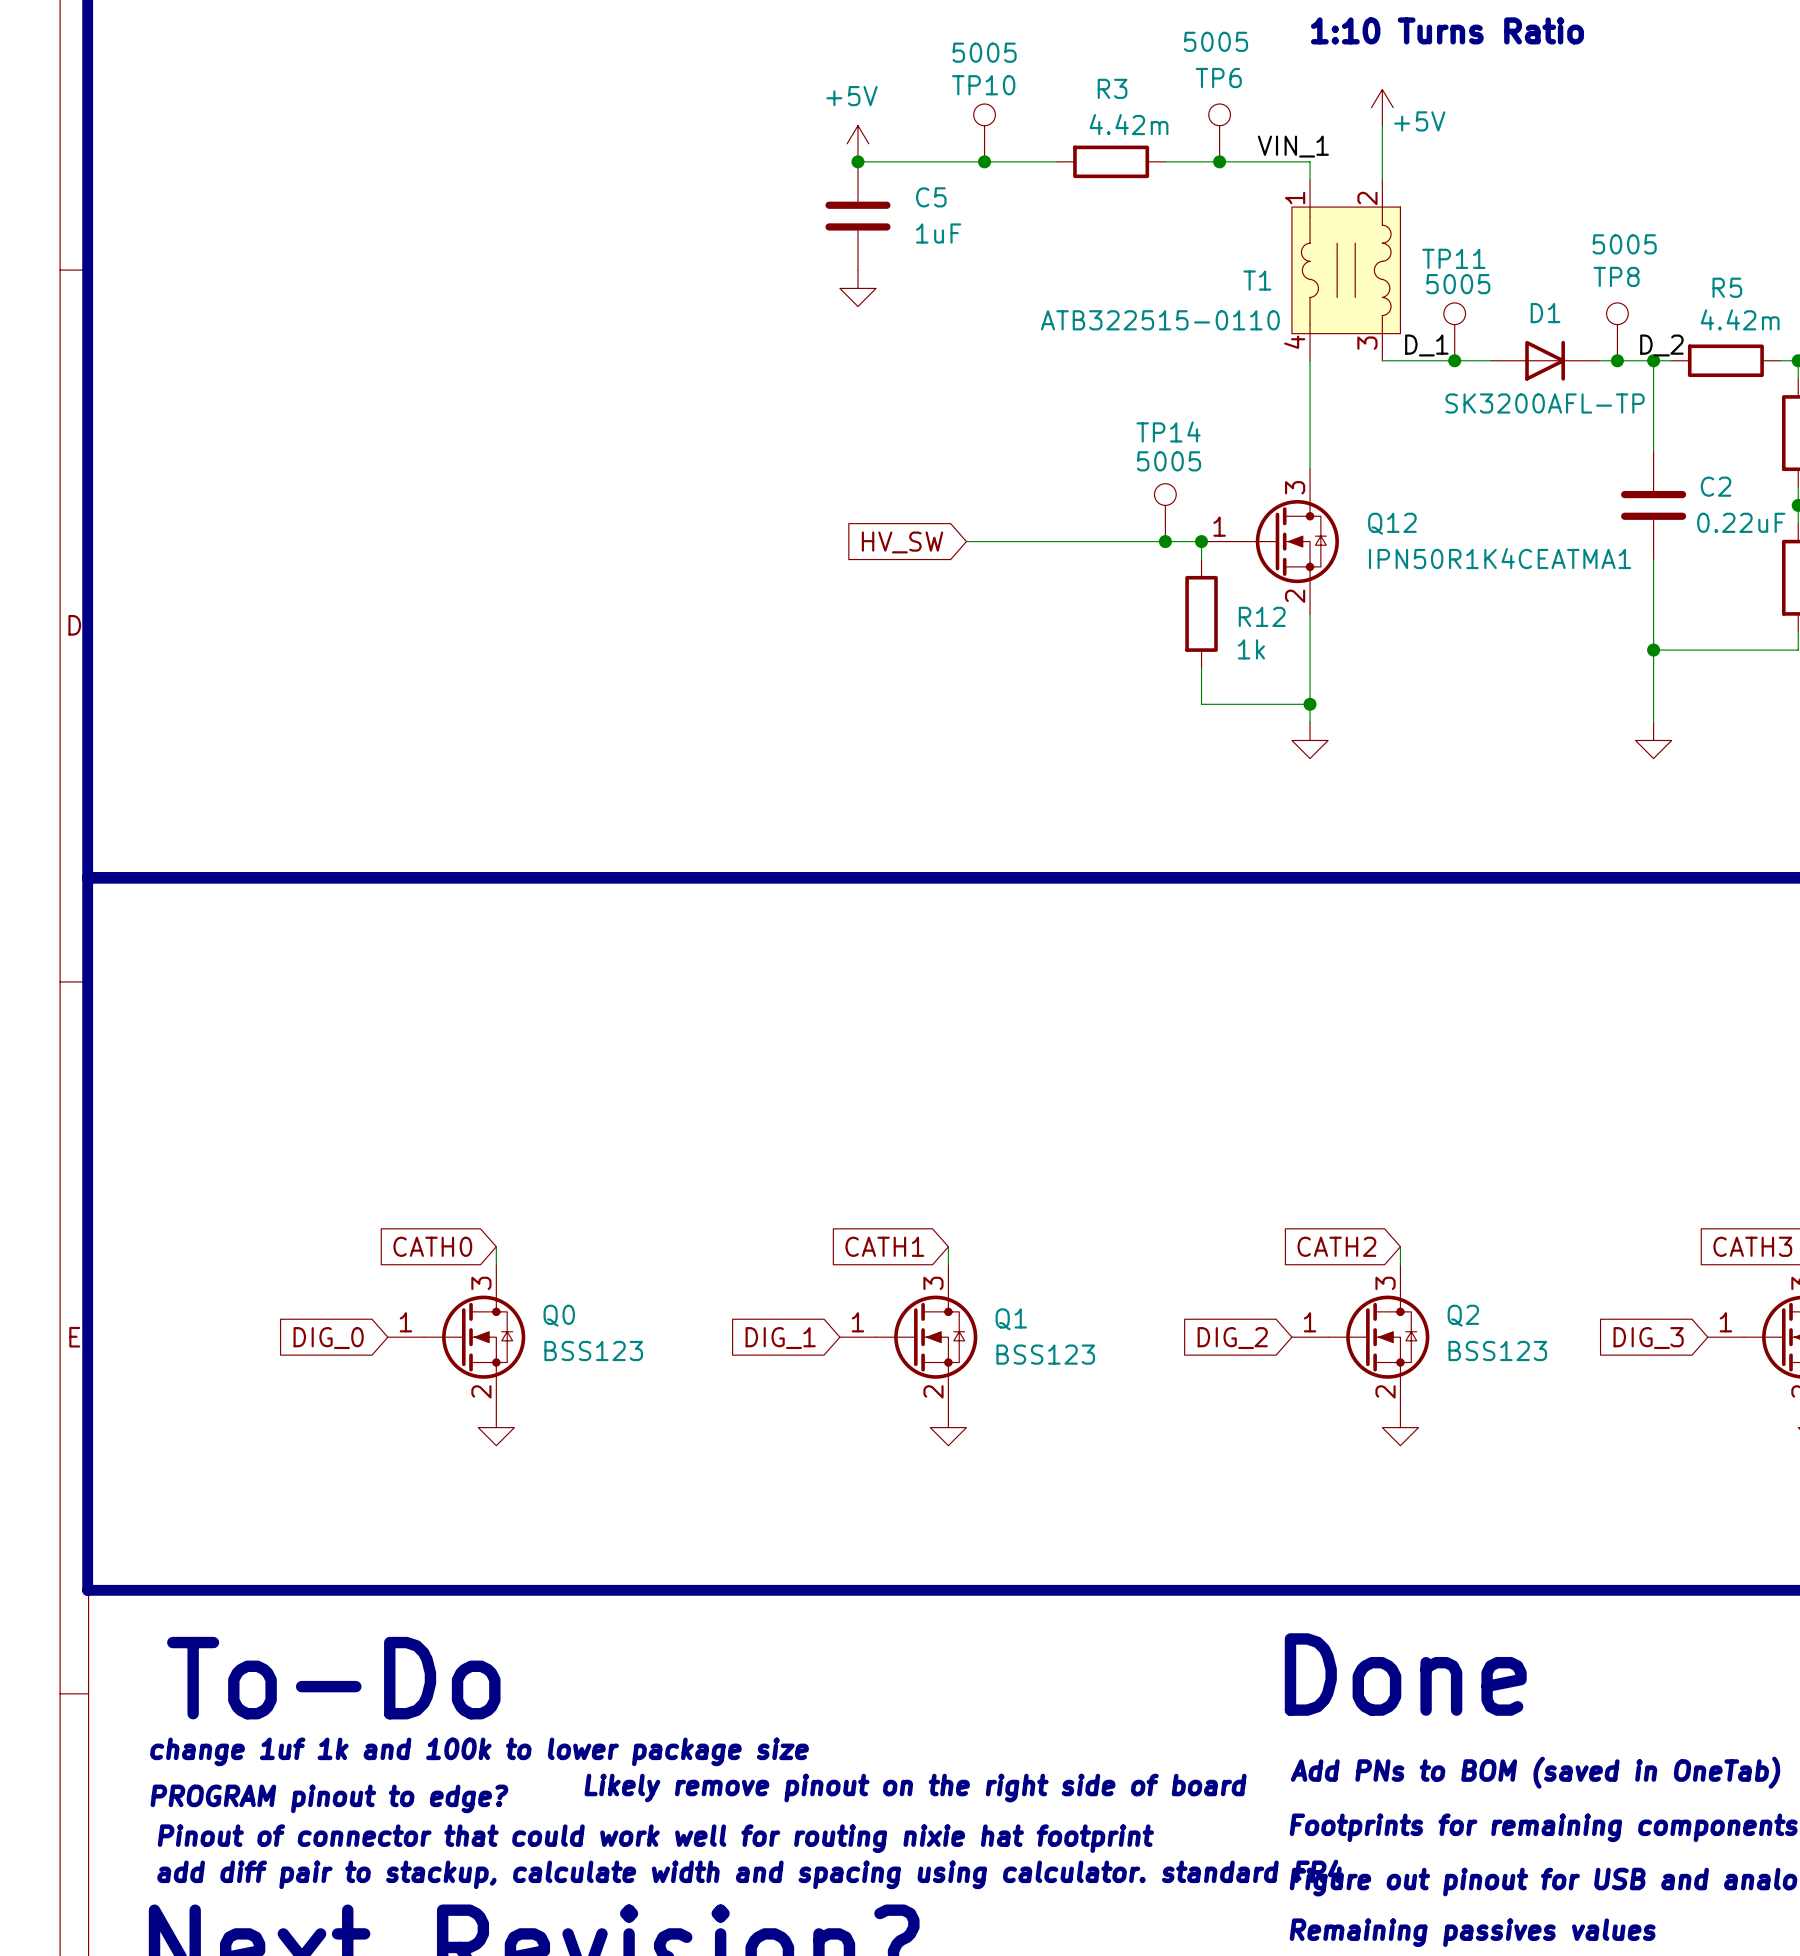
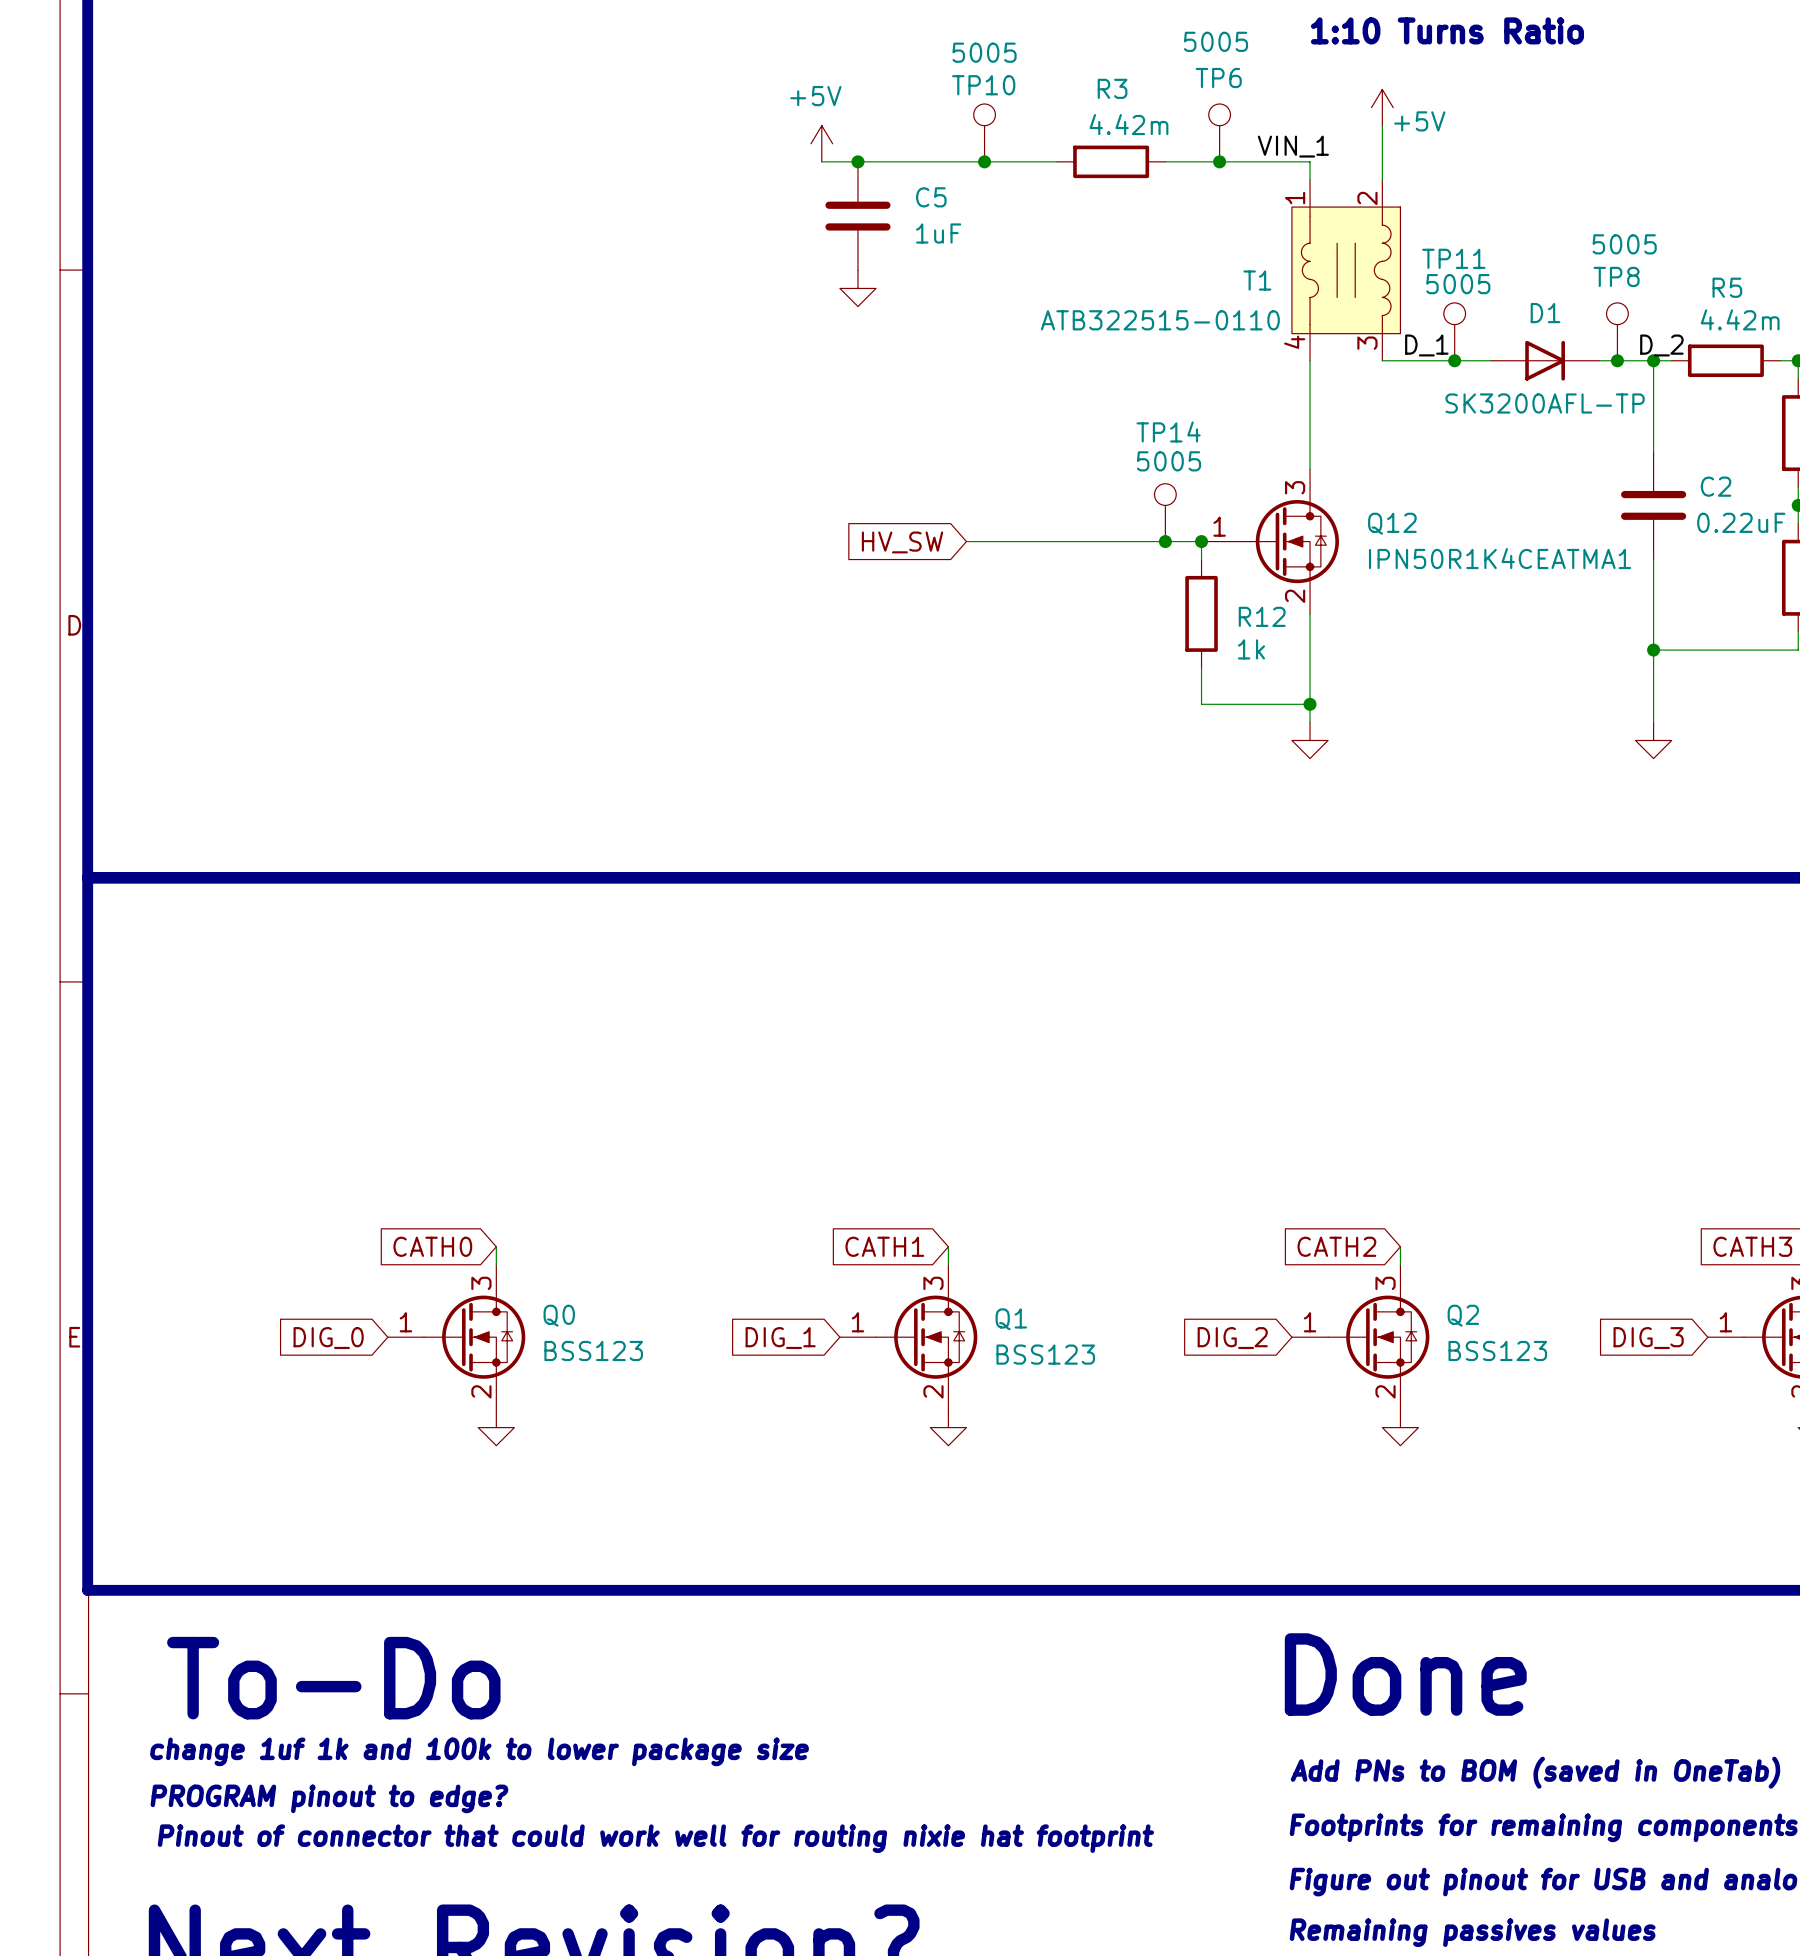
power symbol position: +5V (857, 143) -> +5V (821, 143)
wire: none -> (821, 161) (857, 161)
text: Likely remove pinout on the right side of board (915, 1788) -> none
text: add diff pair to stackup, calculate width and spacing using calculator. standard FR4 (750, 1874) -> none

